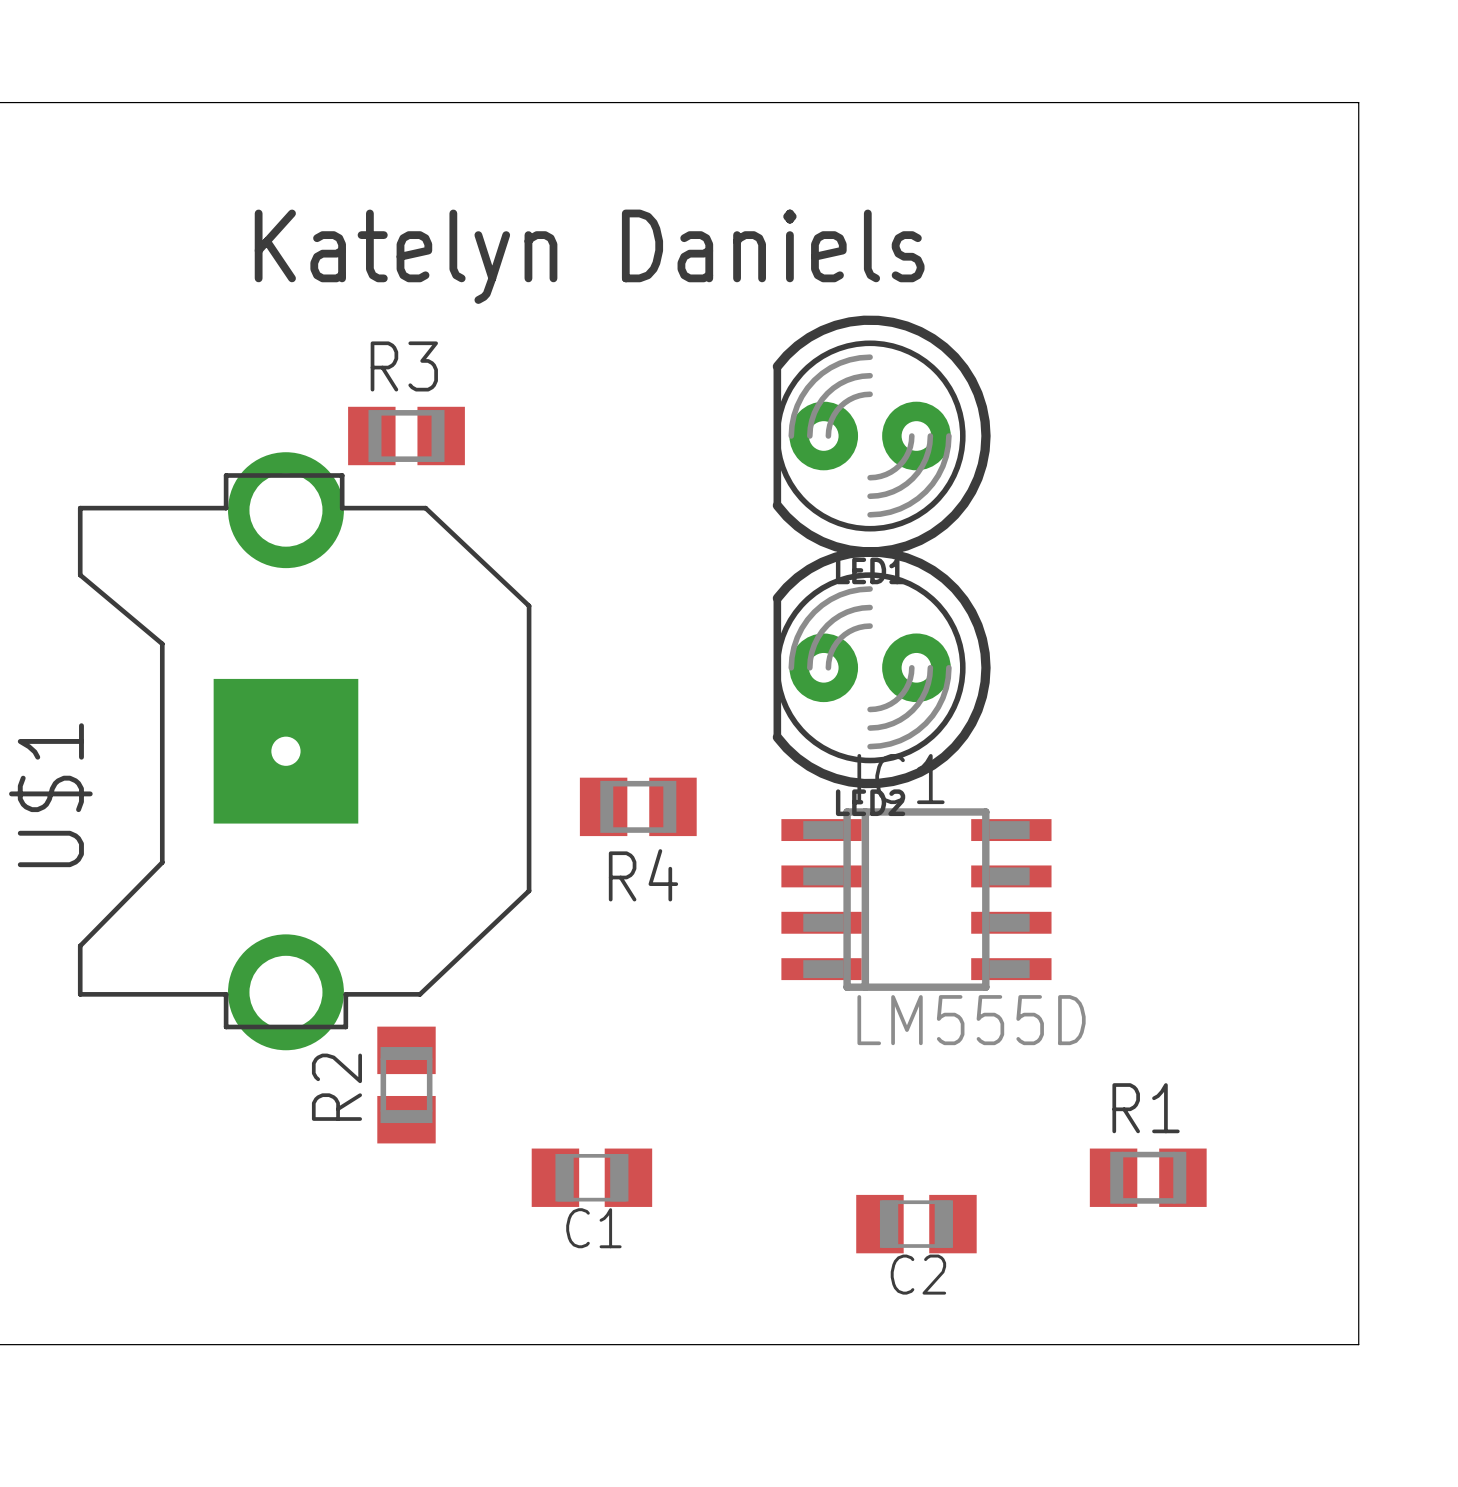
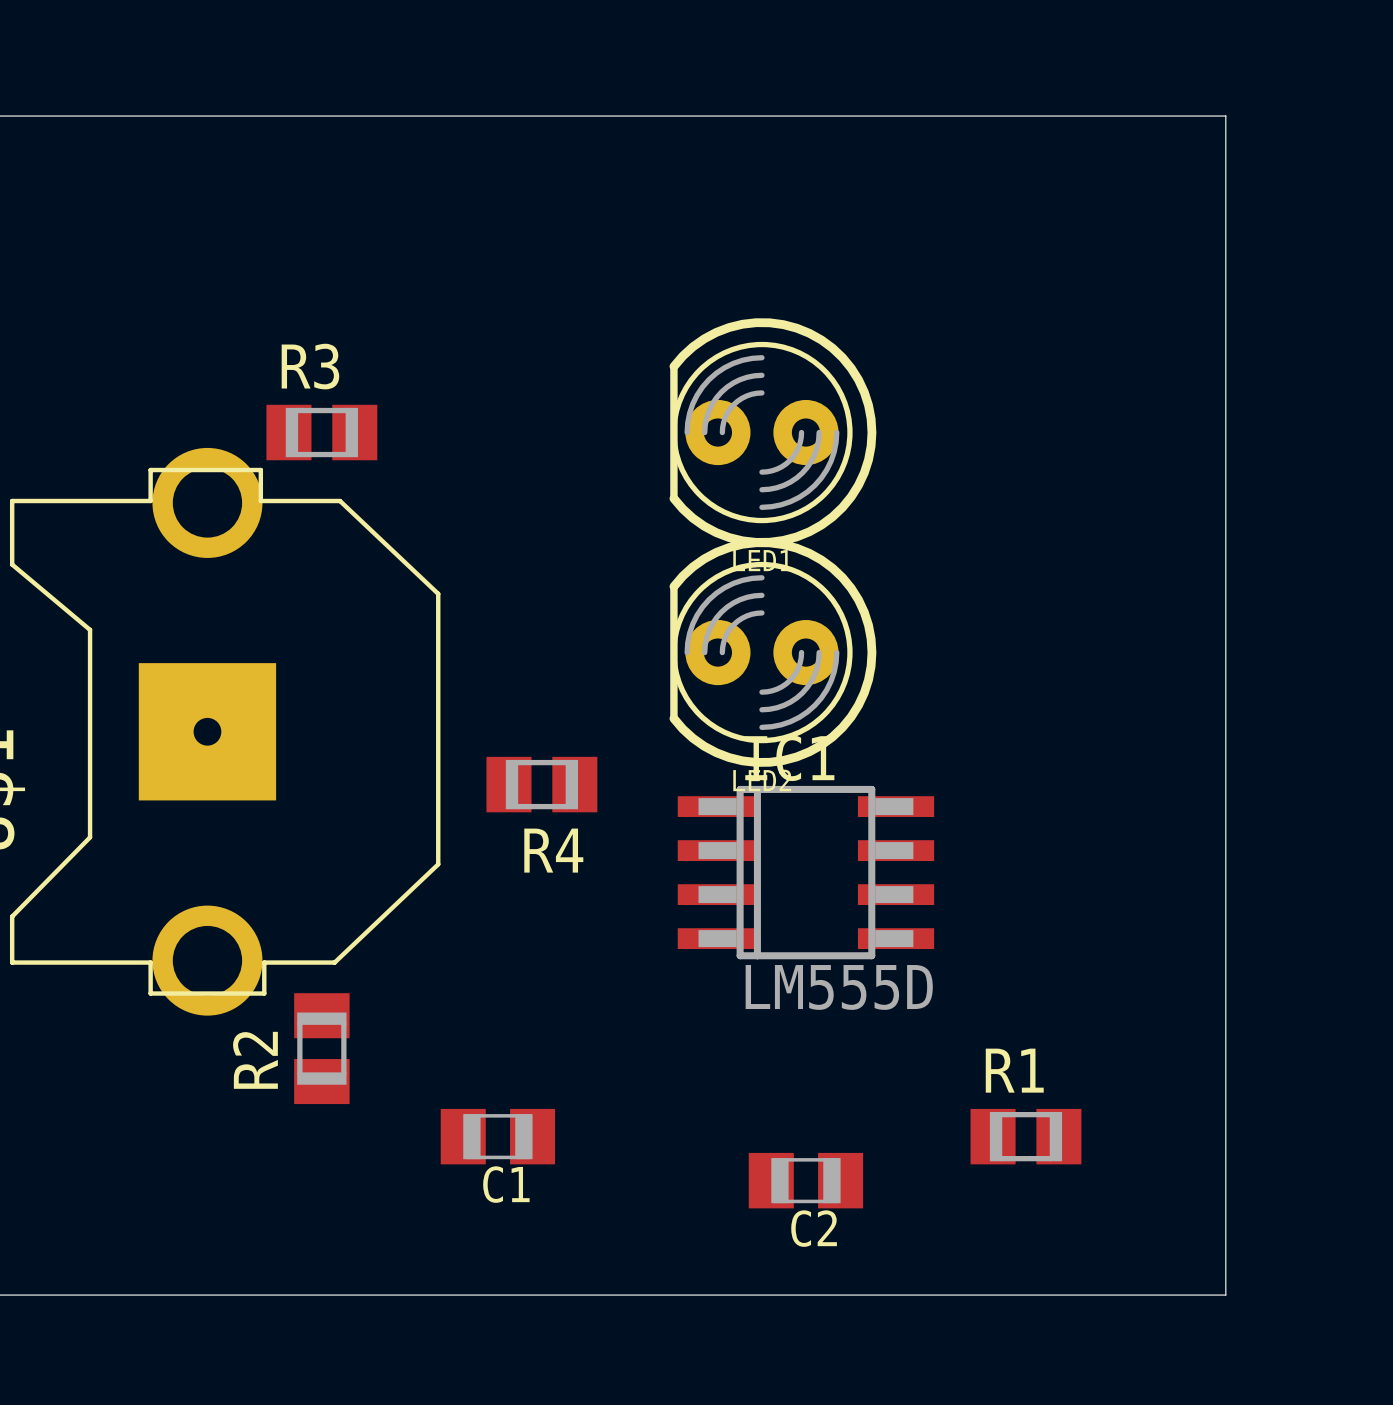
text: Katelyn Daniels (589, 256) -> none

